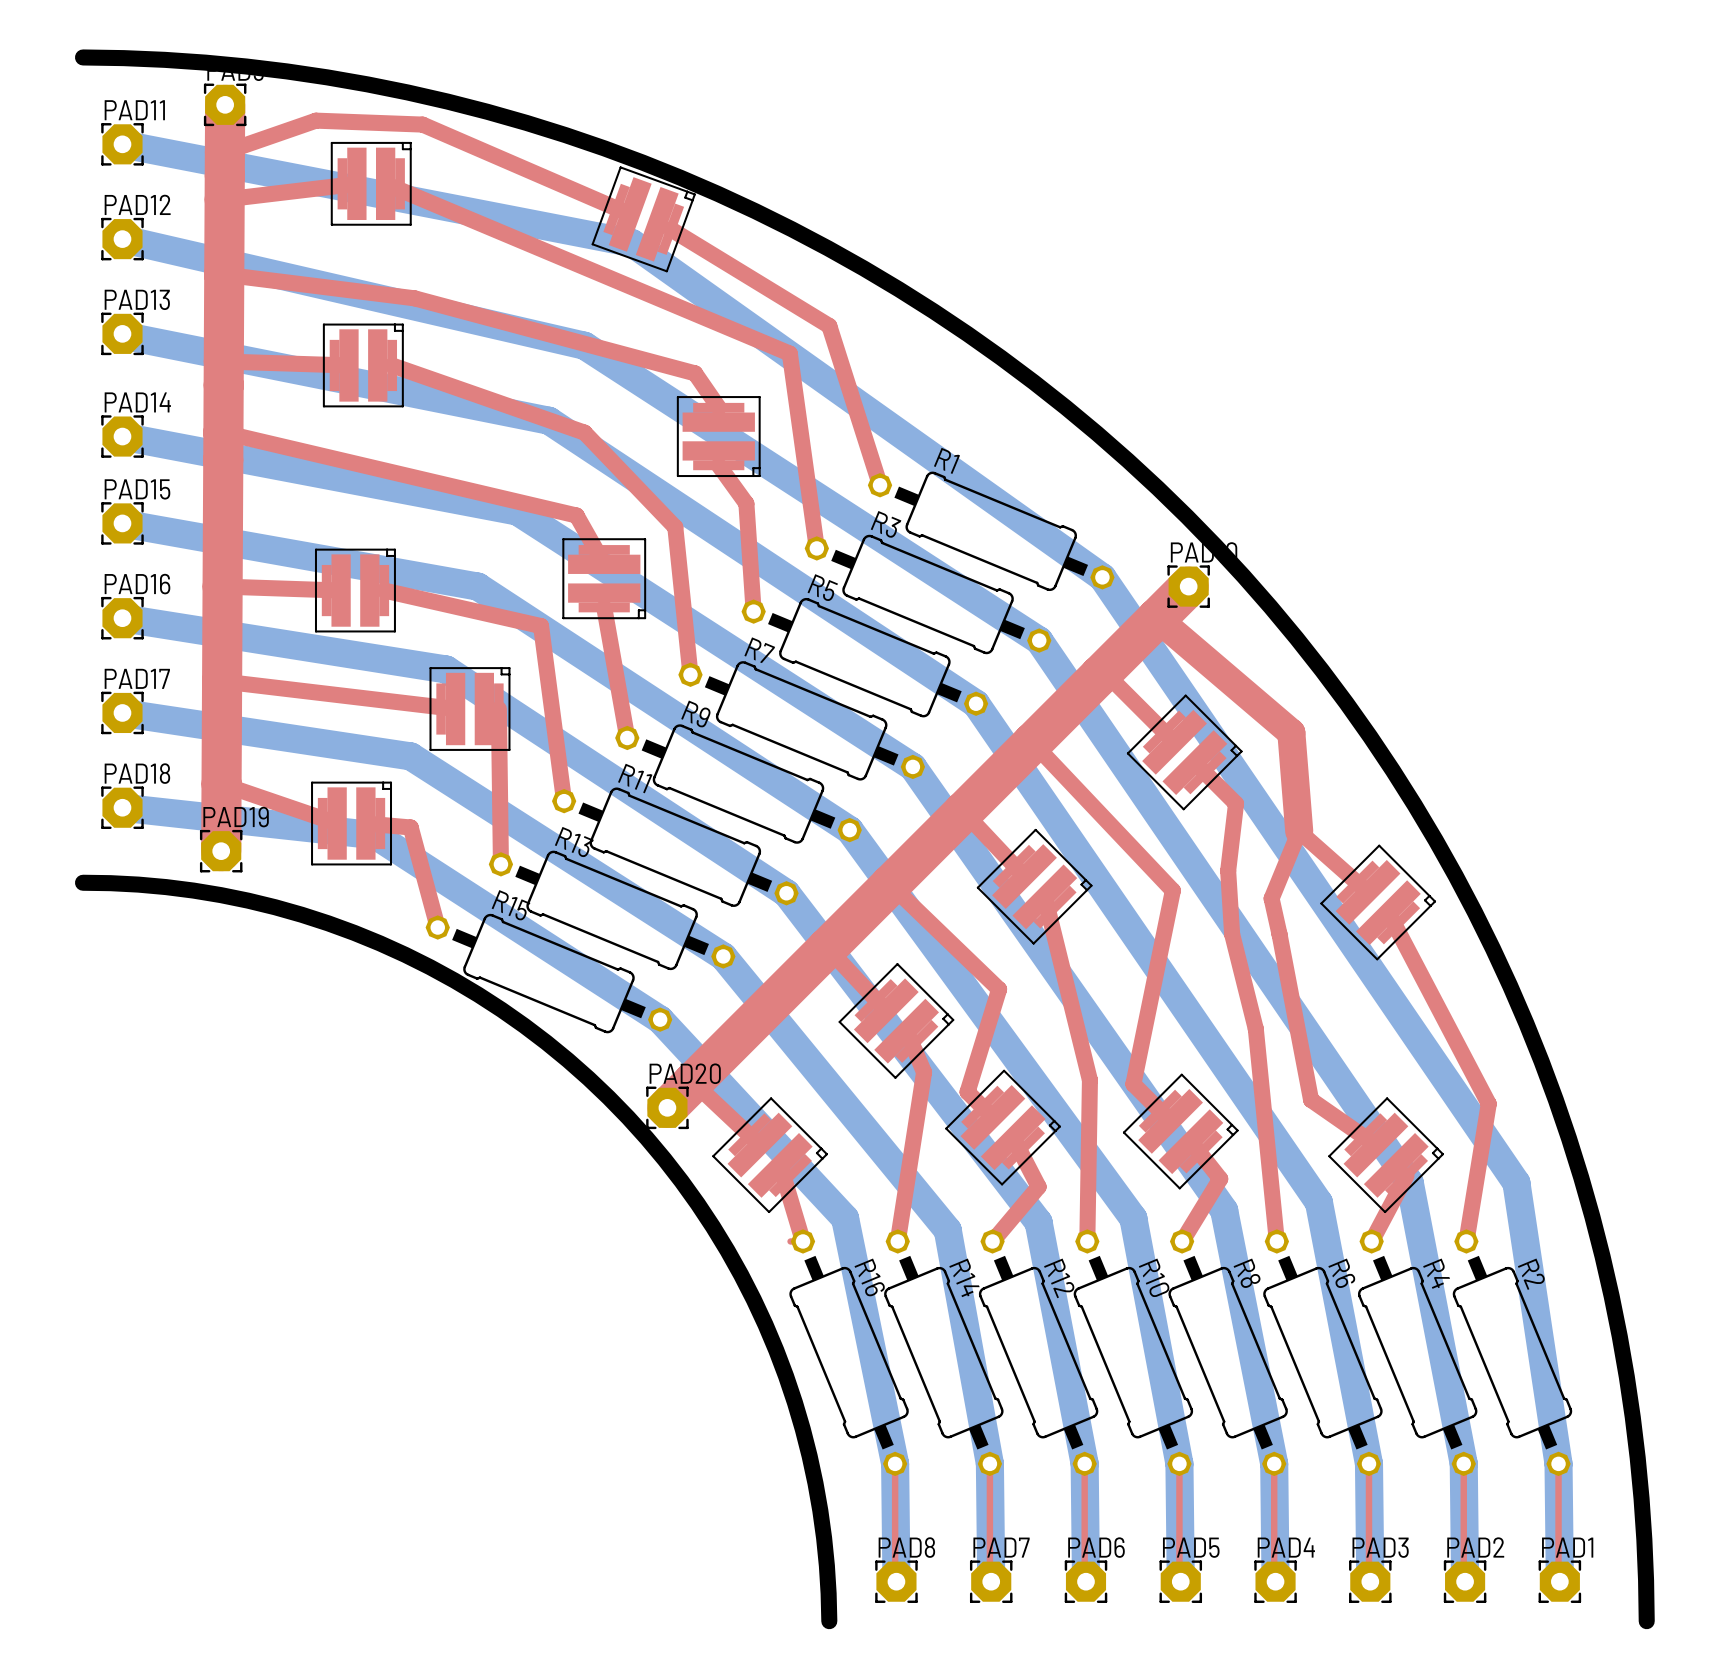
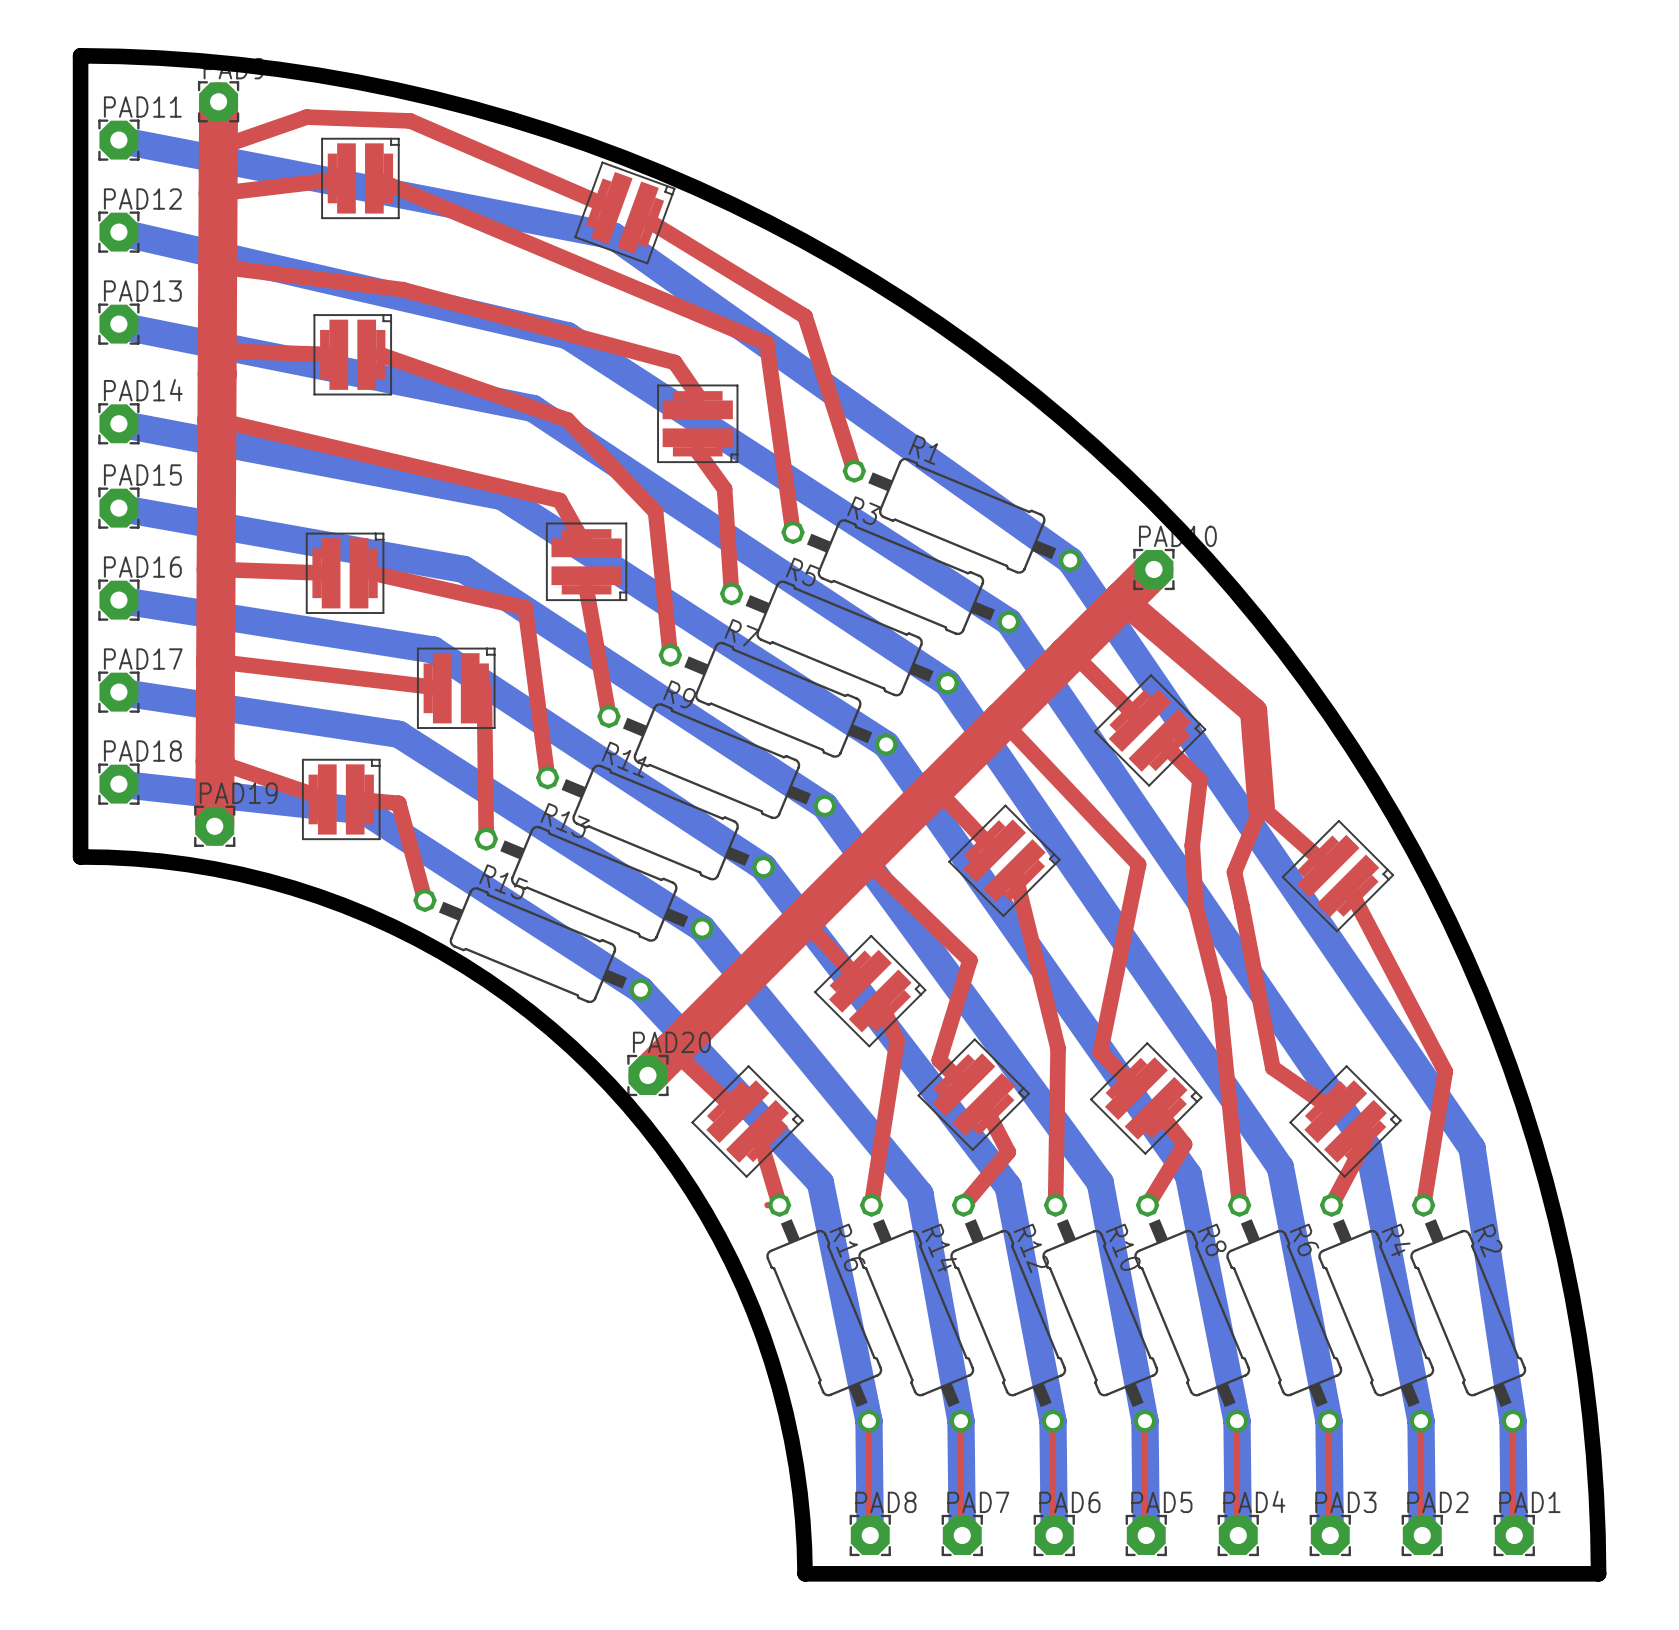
board edge: none -> (80, 55) (80, 856)
board edge: none -> (805, 1573) (1598, 1573)

